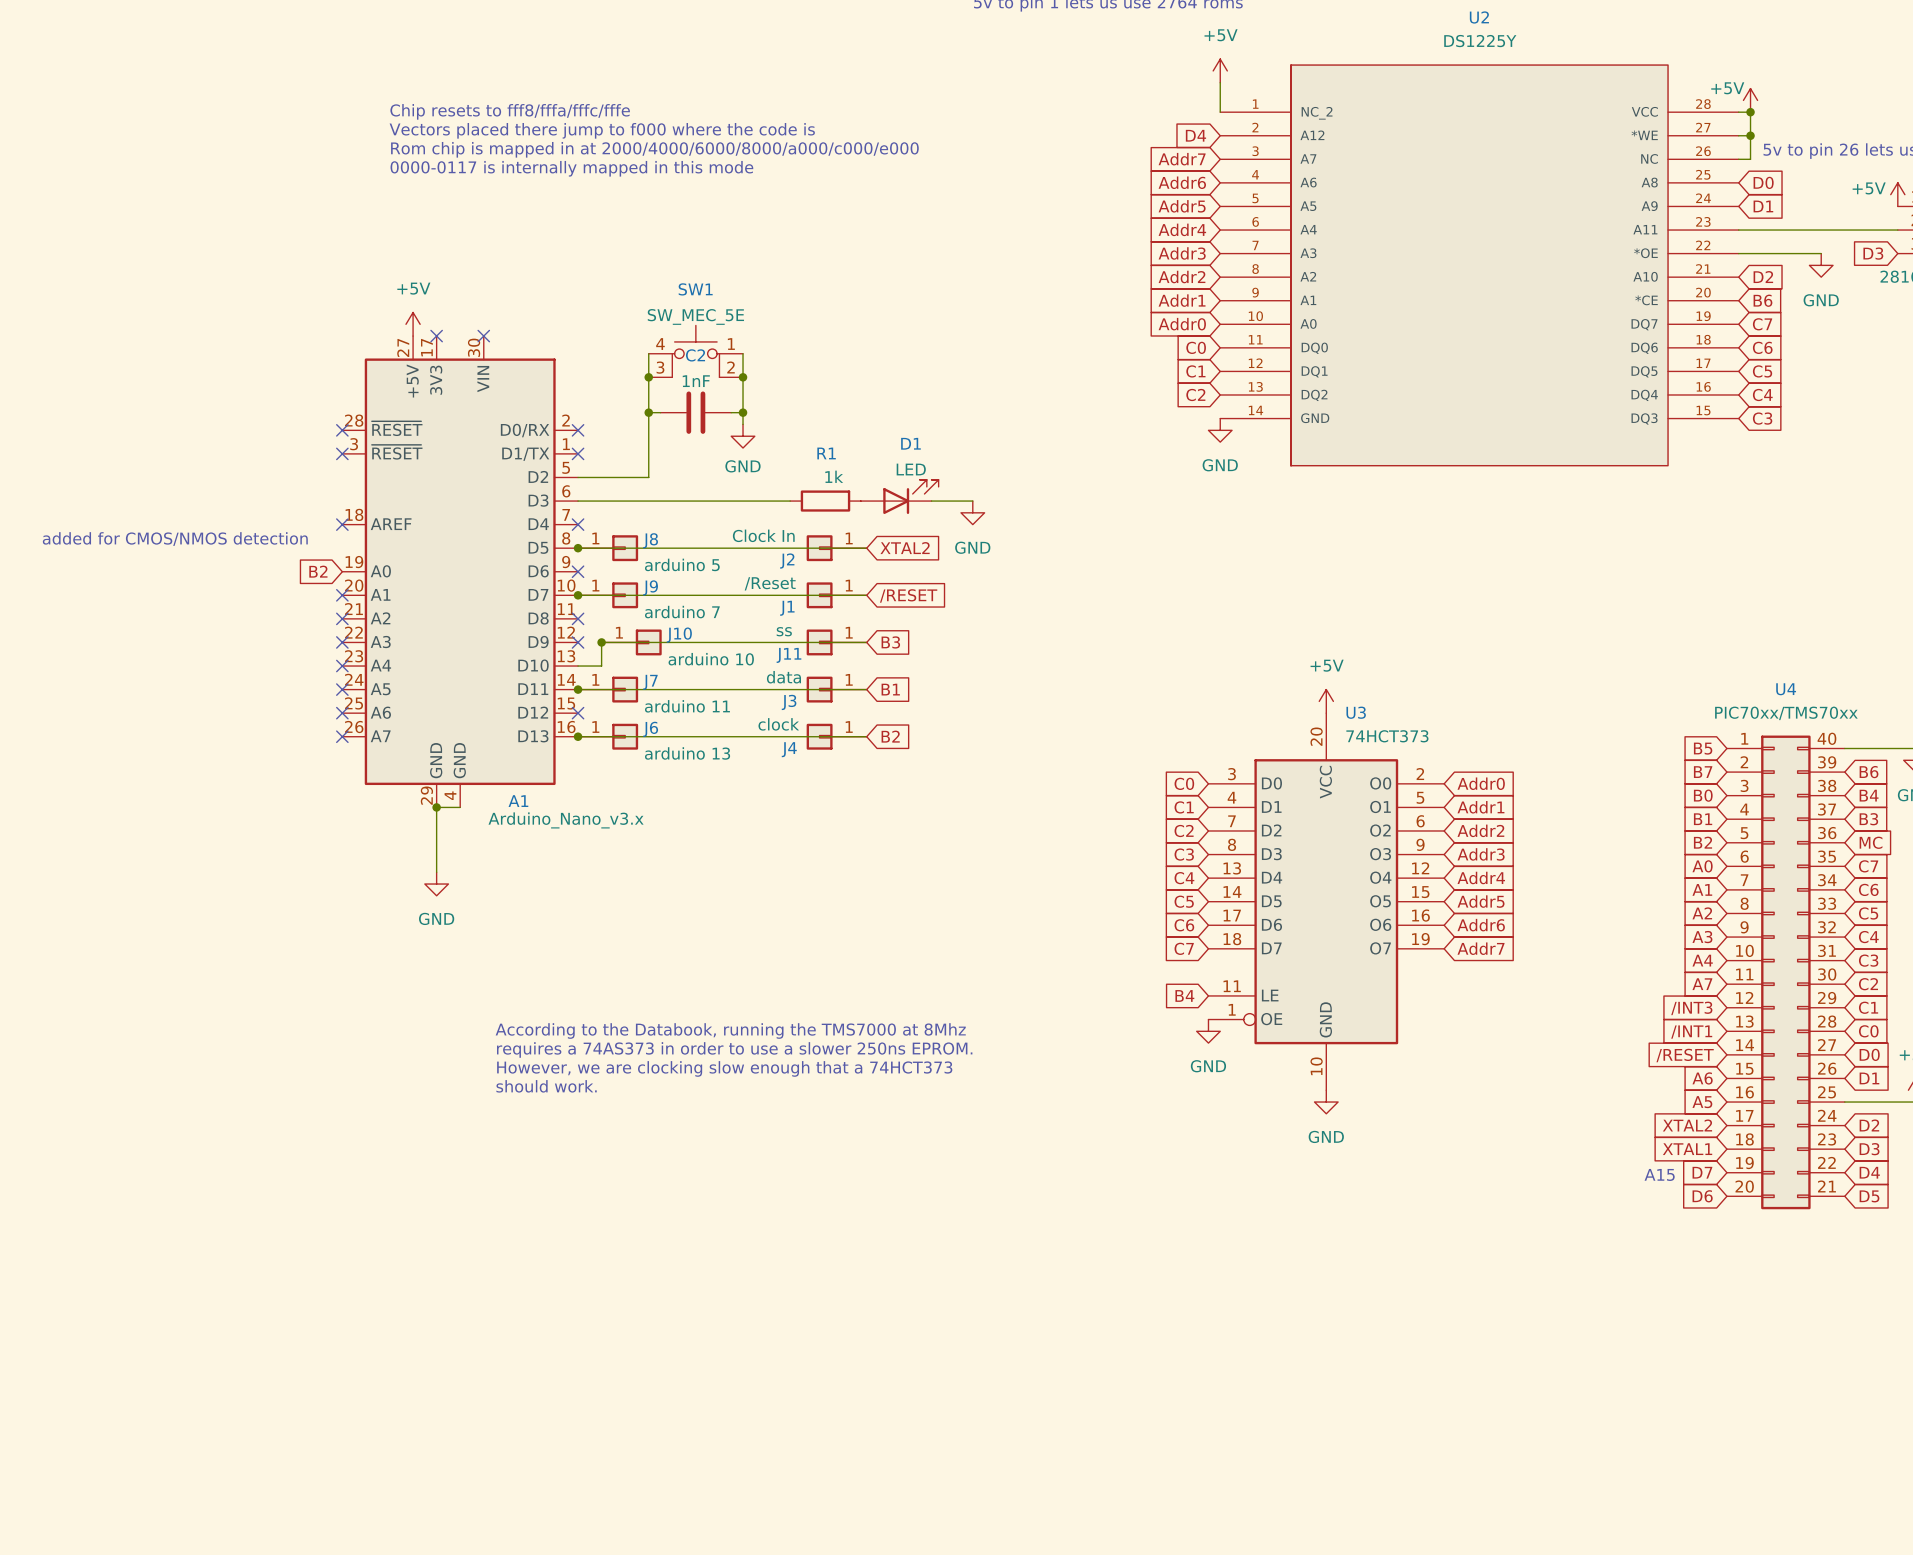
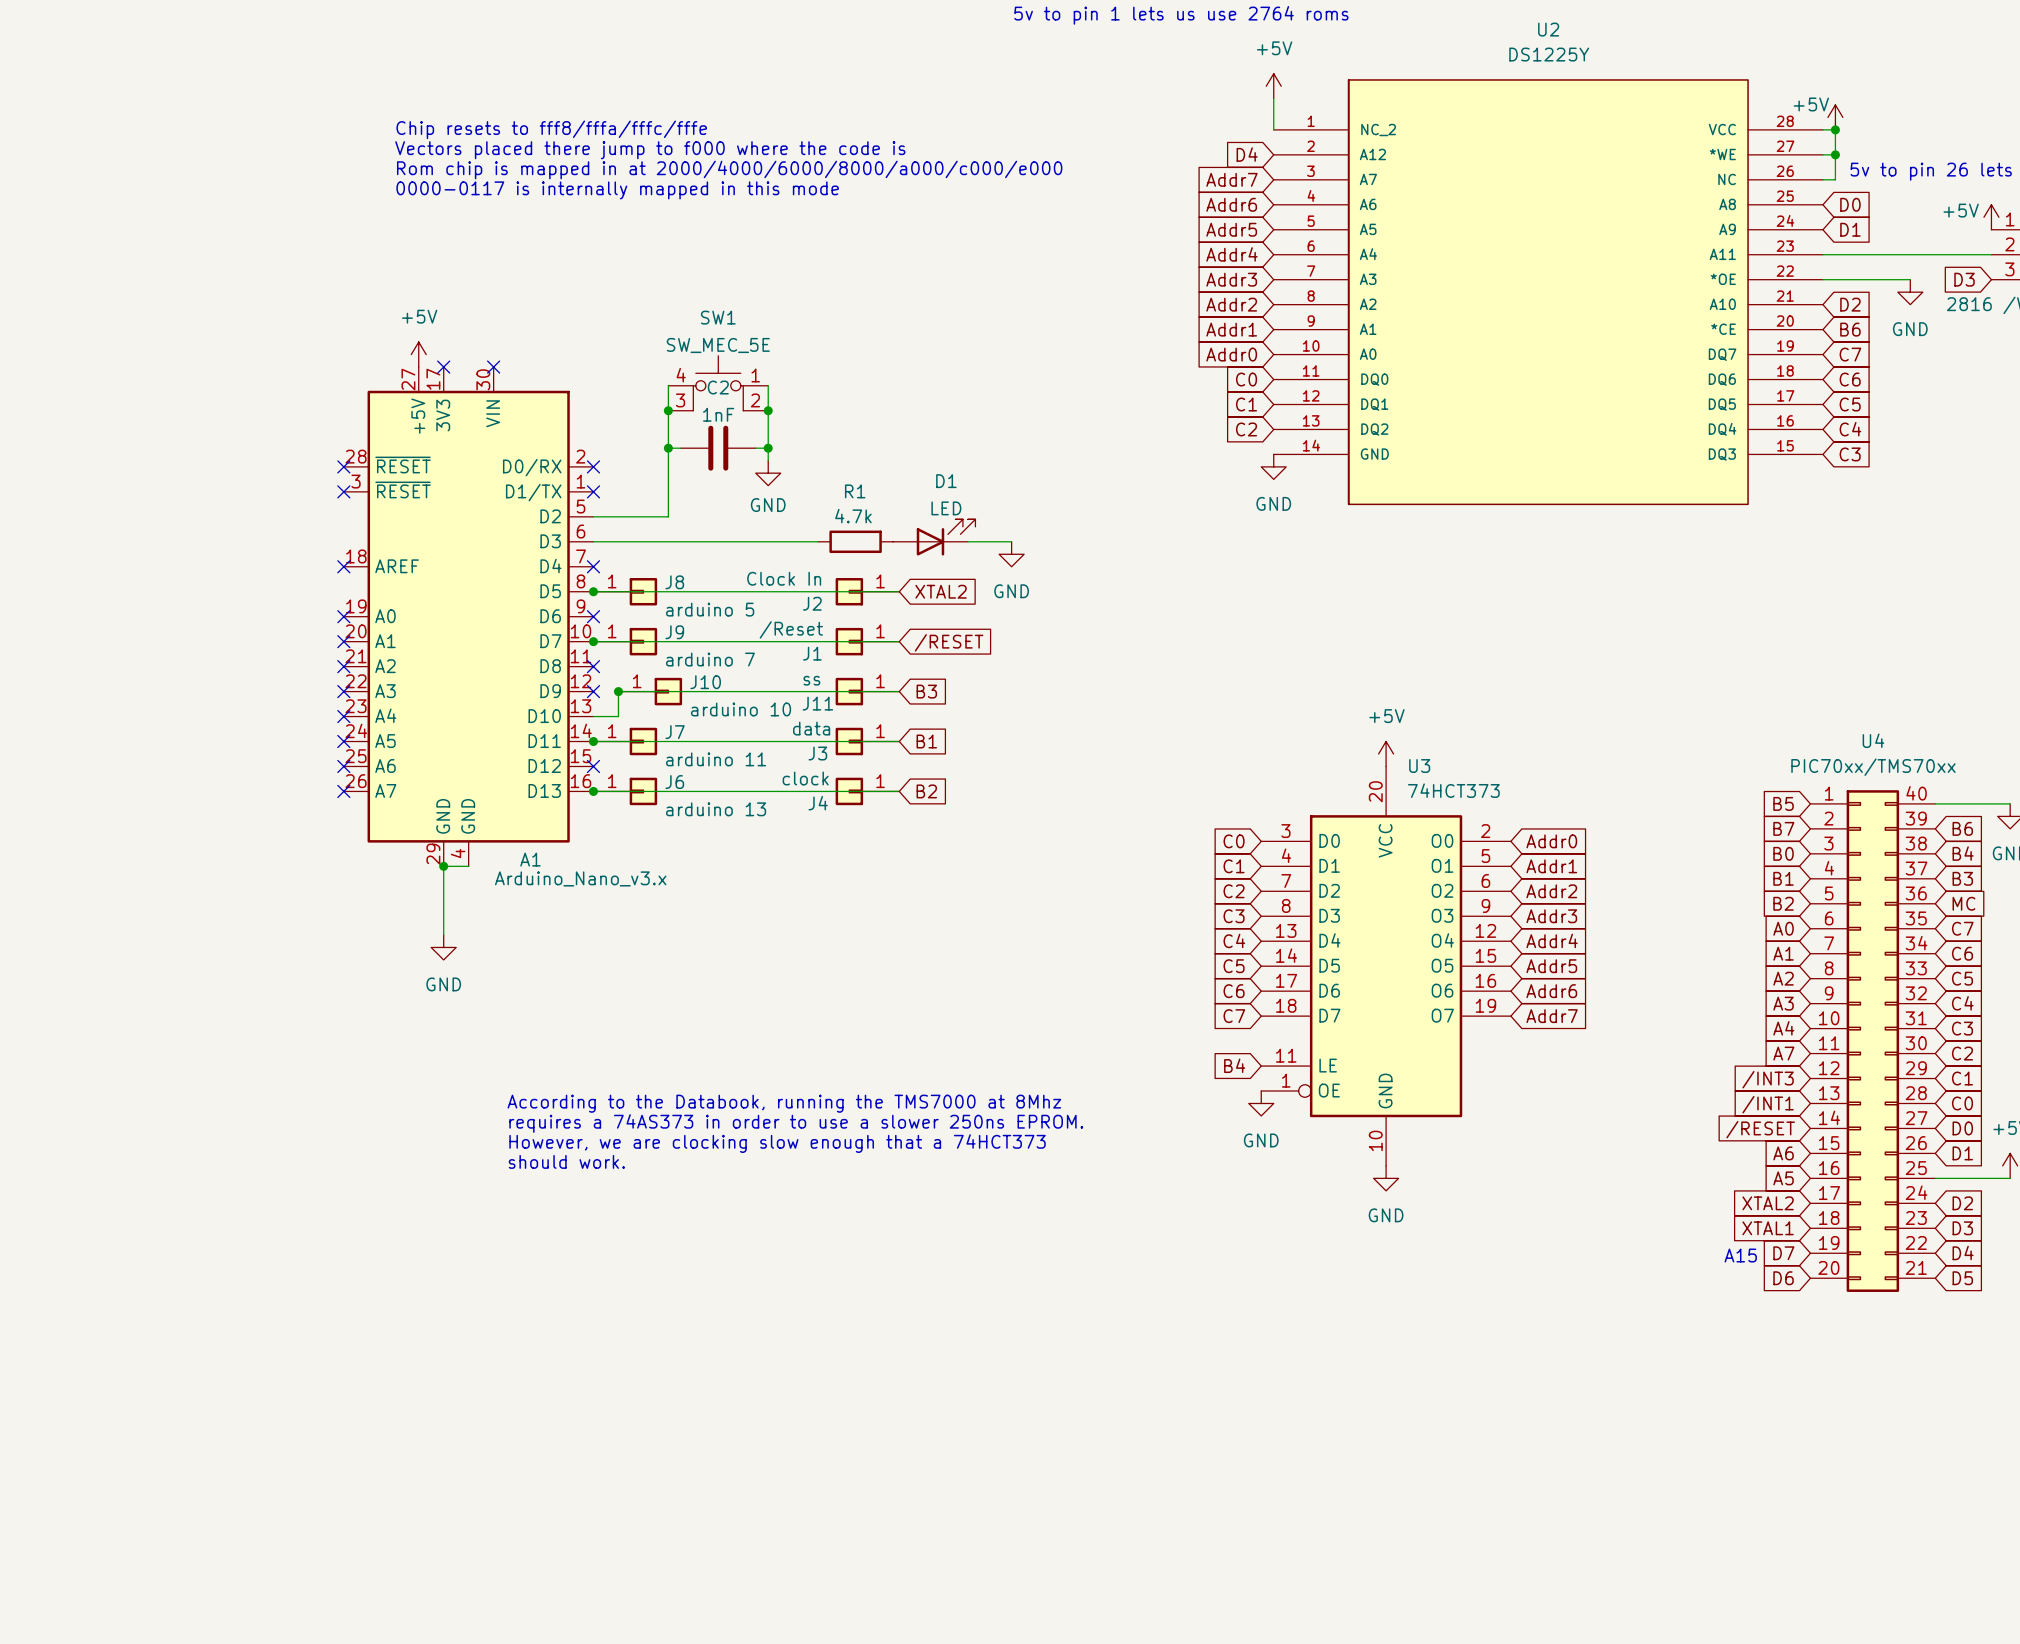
R1 value: 1k (834, 476) -> 4.7k (853, 516)
text: added for CMOS/NMOS detection (175, 539) -> none
global label: B2 (318, 571) -> none
no-connect mark: none -> (343, 616)

